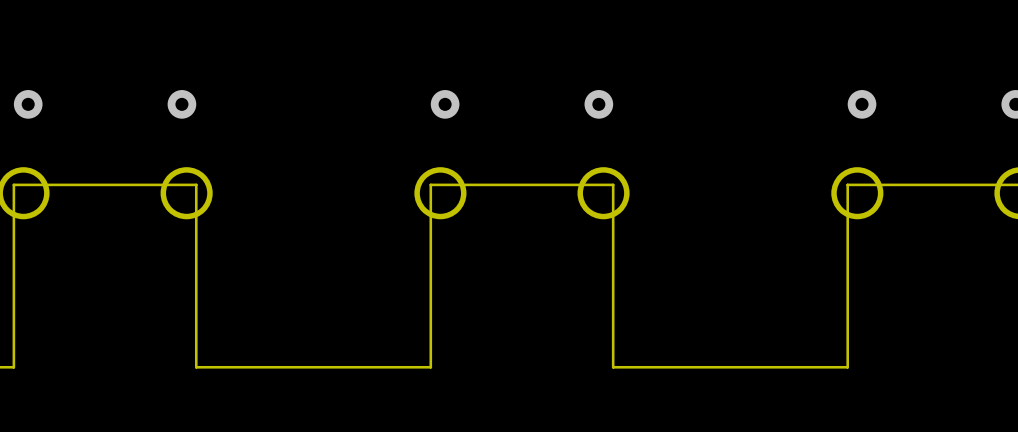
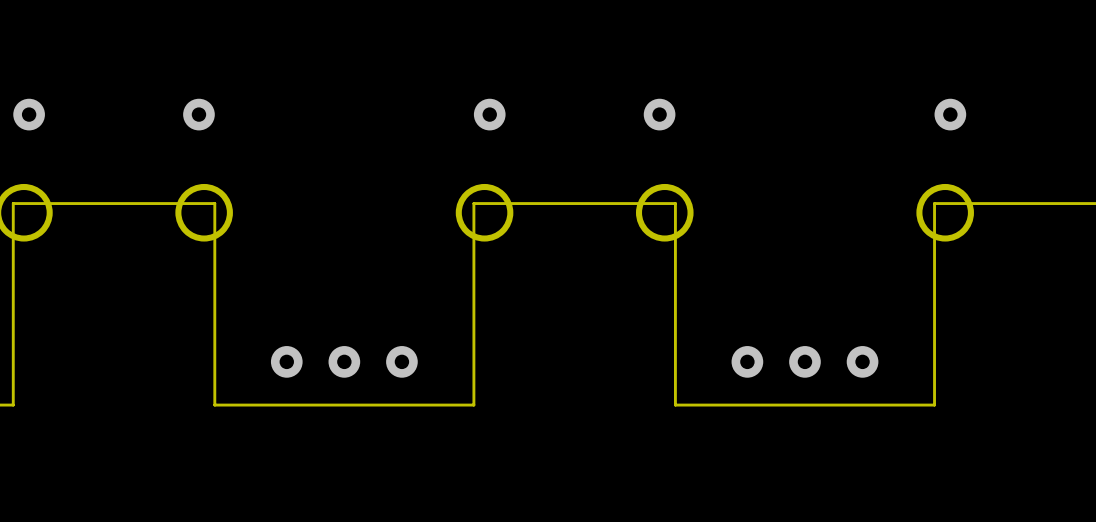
via: none -> (286, 361)
via: none -> (344, 361)
via: none -> (401, 361)
via: none -> (747, 361)
via: none -> (804, 361)
via: none -> (862, 361)

